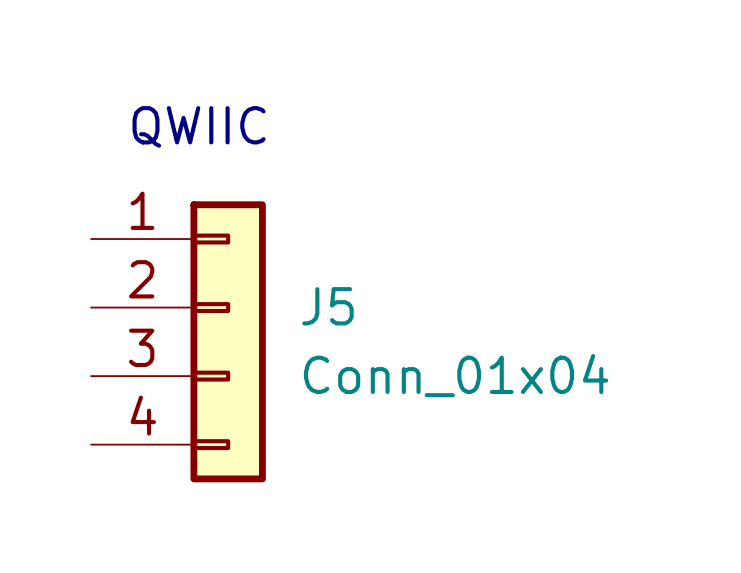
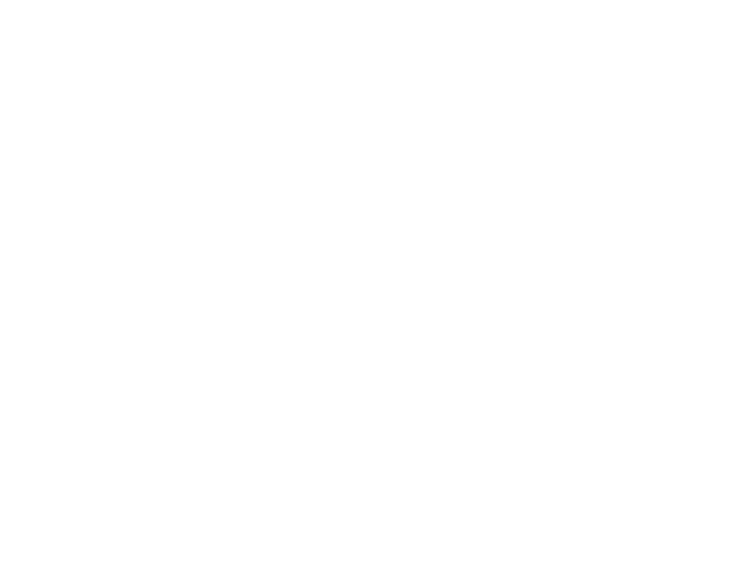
text: QWIIC (199, 126) -> none
J5: Conn_01x04 (178, 341) -> none

